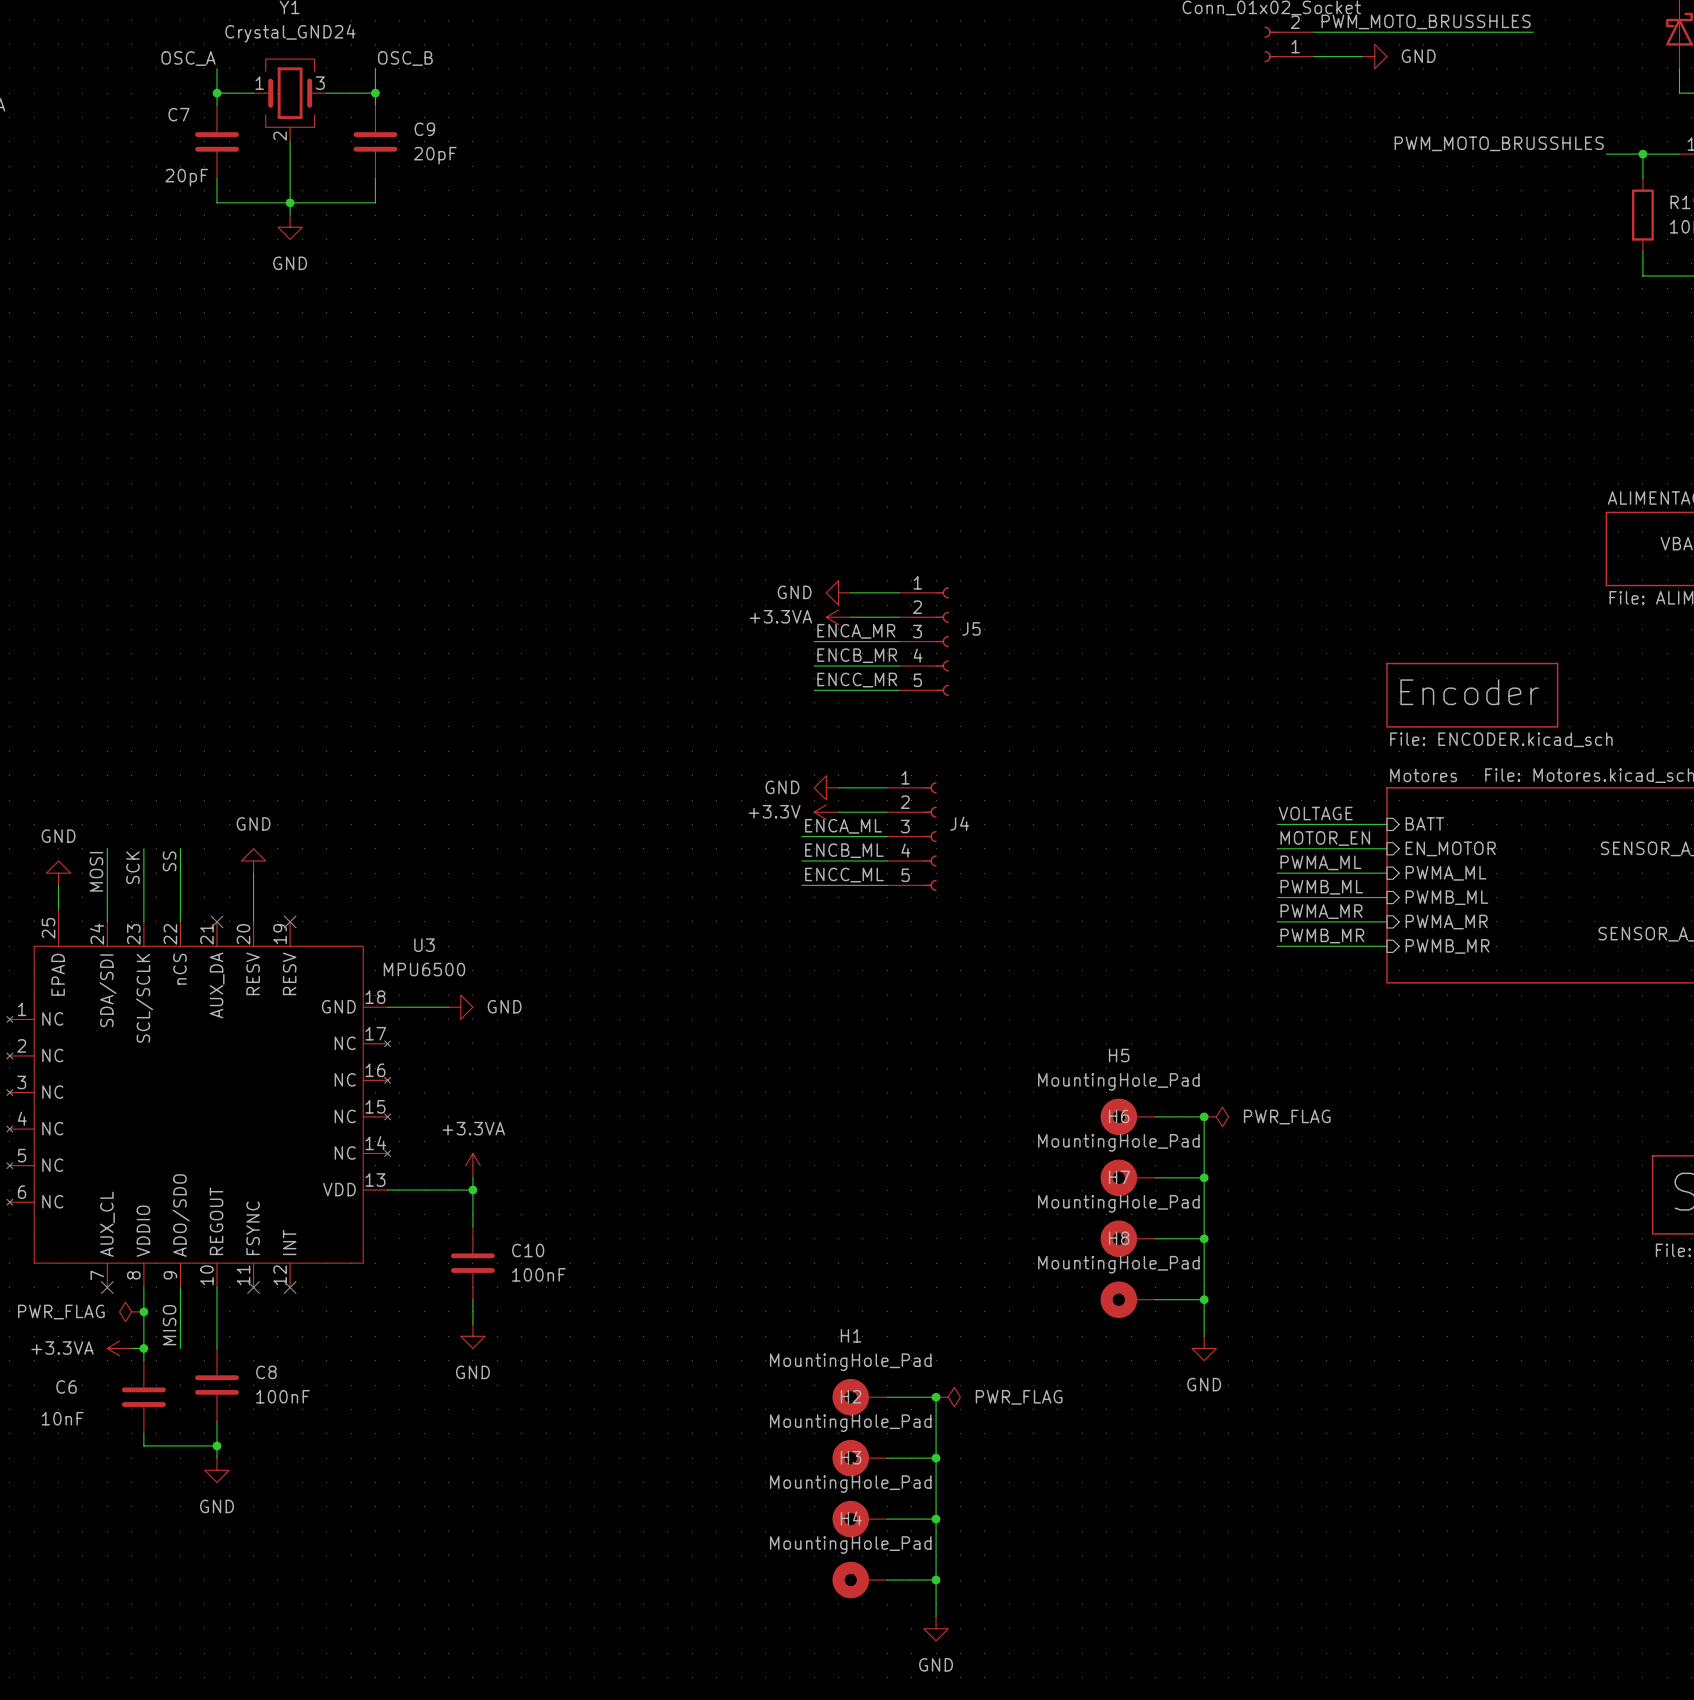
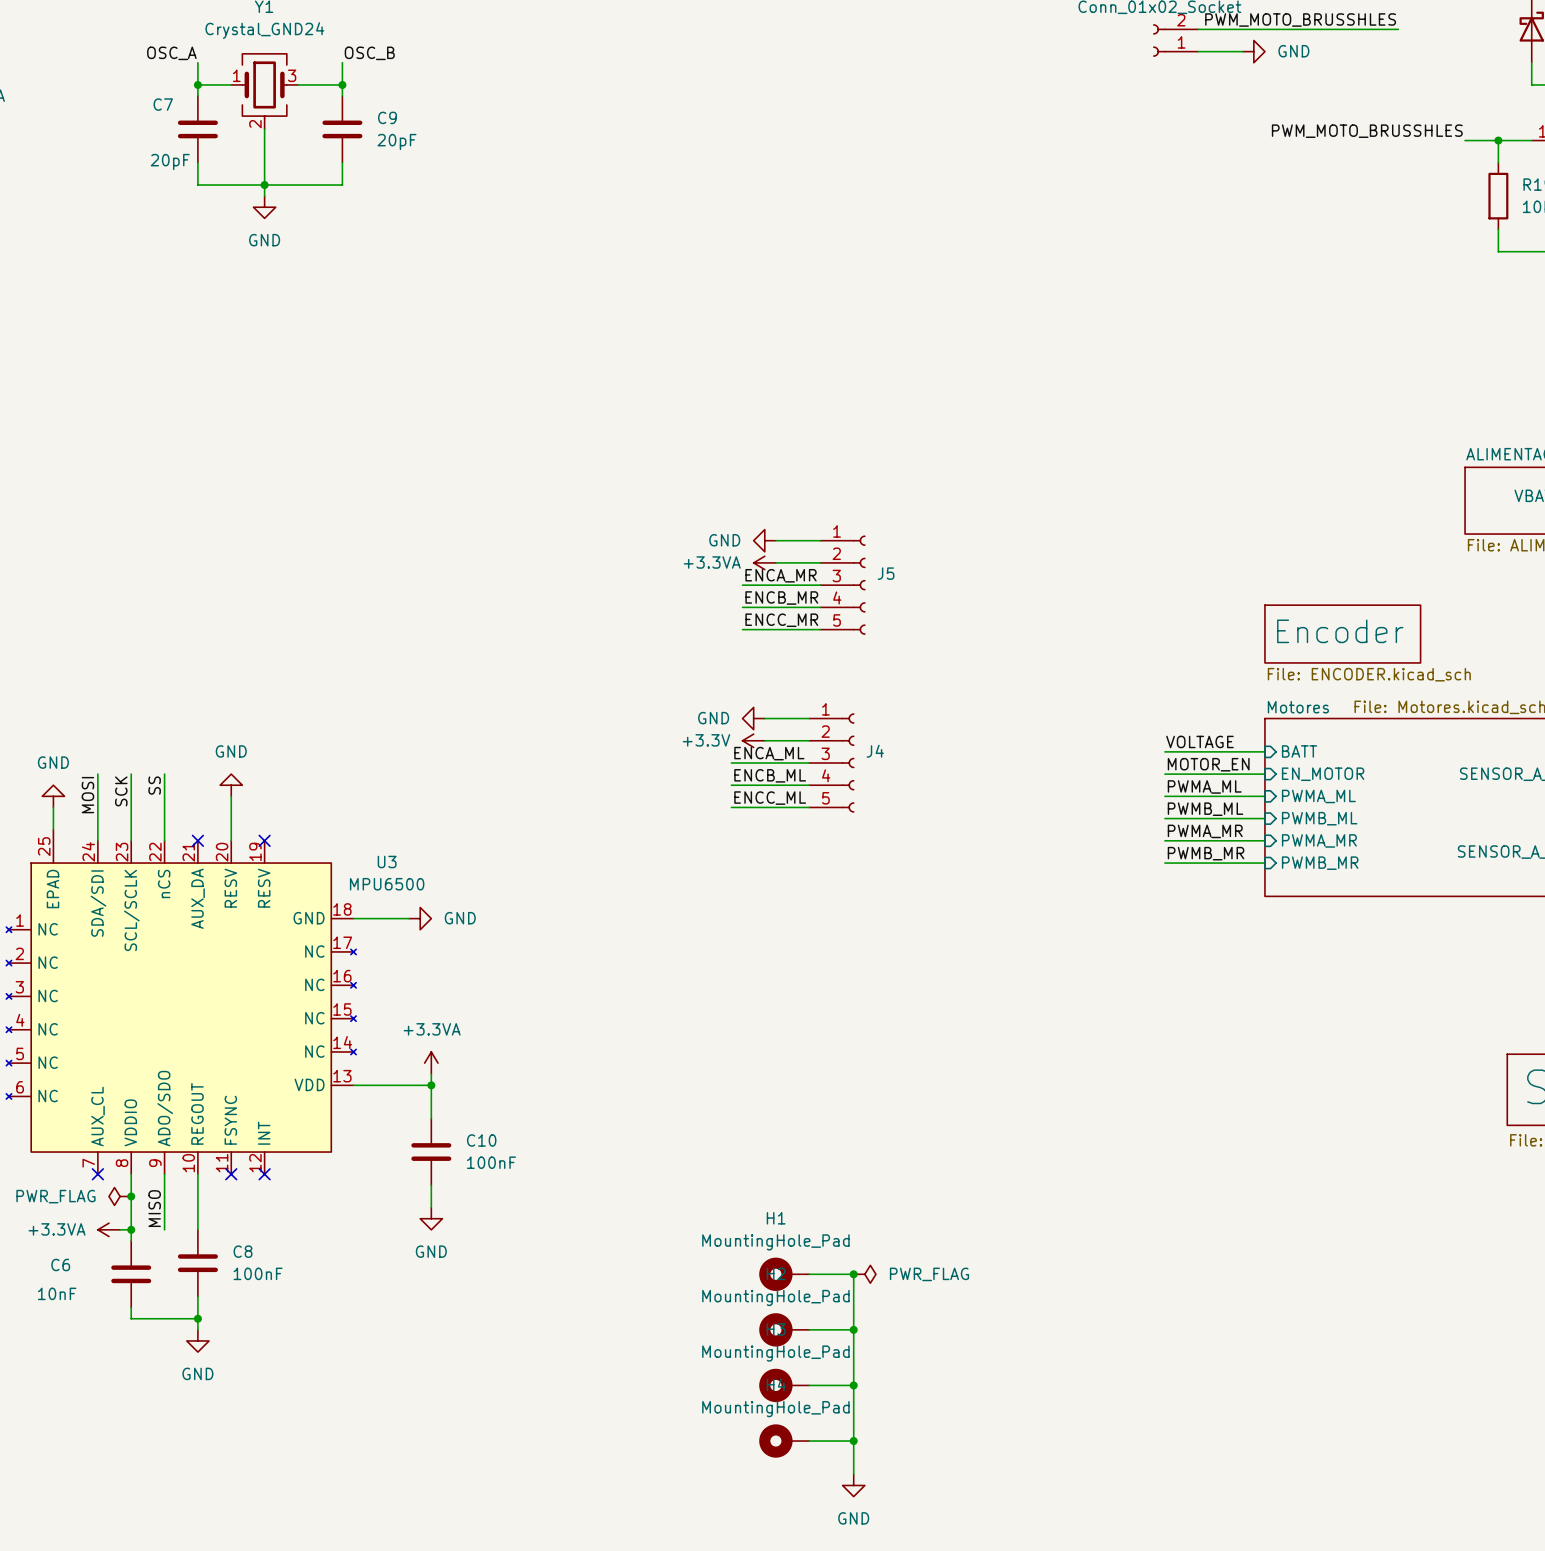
H5: MountingHole_Pad (1128, 1116) -> none
wire: (1155, 1116) (1204, 1116) (1204, 1336) -> none
junction: (1204, 1116) -> none
power symbol: PWR_FLAG (1216, 1116) -> none
H6: MountingHole_Pad (1128, 1177) -> none
wire: (1155, 1177) (1204, 1177) -> none
junction: (1204, 1177) -> none
H7: MountingHole_Pad (1128, 1238) -> none
wire: (1155, 1238) (1204, 1238) -> none
junction: (1204, 1238) -> none
H8: MountingHole_Pad (1128, 1299) -> none
wire: (1155, 1299) (1204, 1299) -> none
junction: (1204, 1299) -> none
power symbol: GND (1204, 1348) -> none

